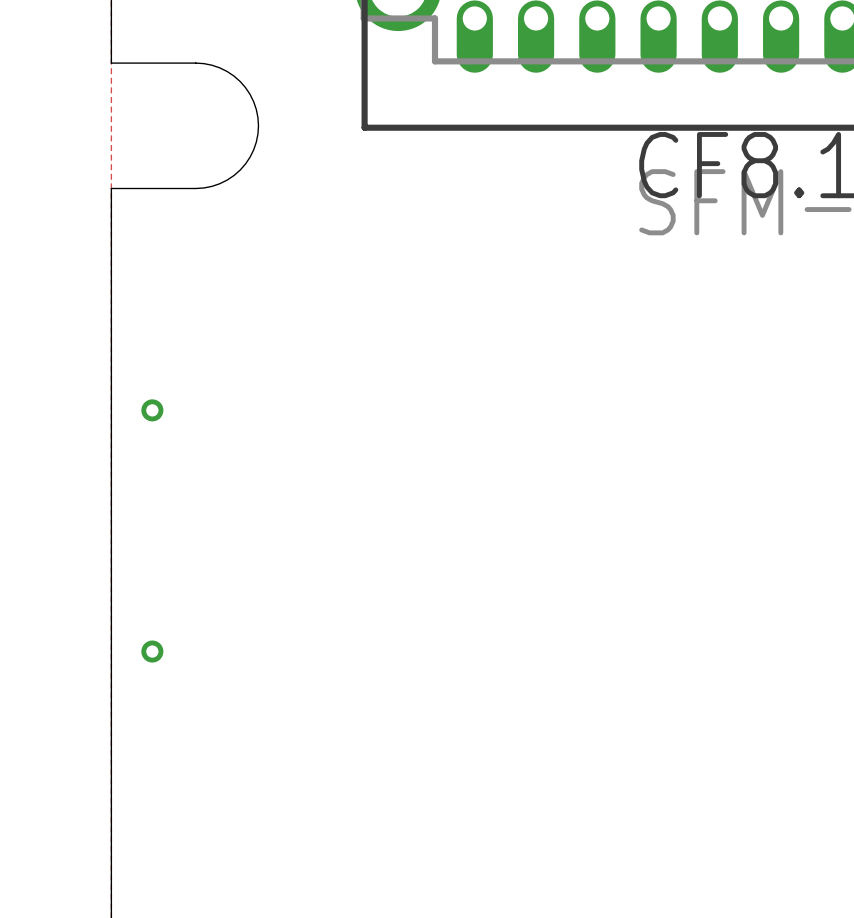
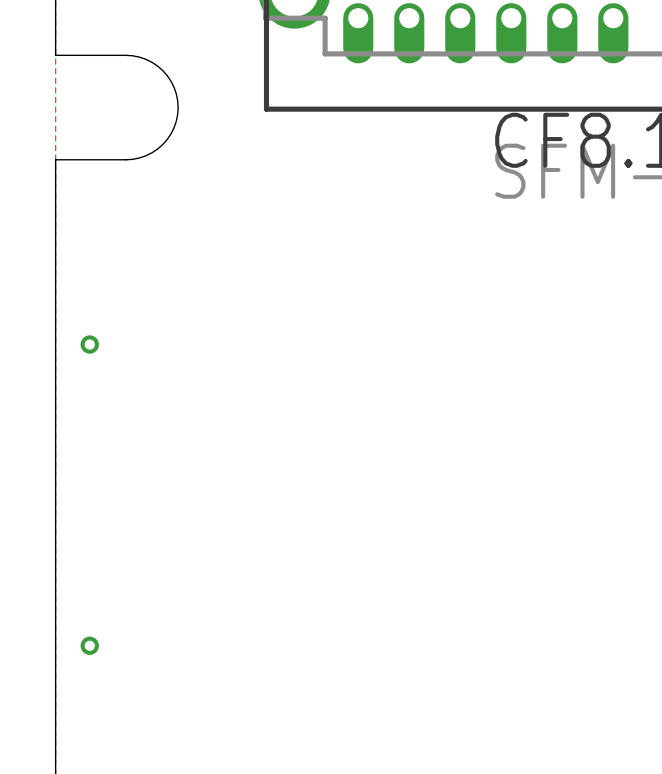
via position: (152, 651) -> (89, 645)

